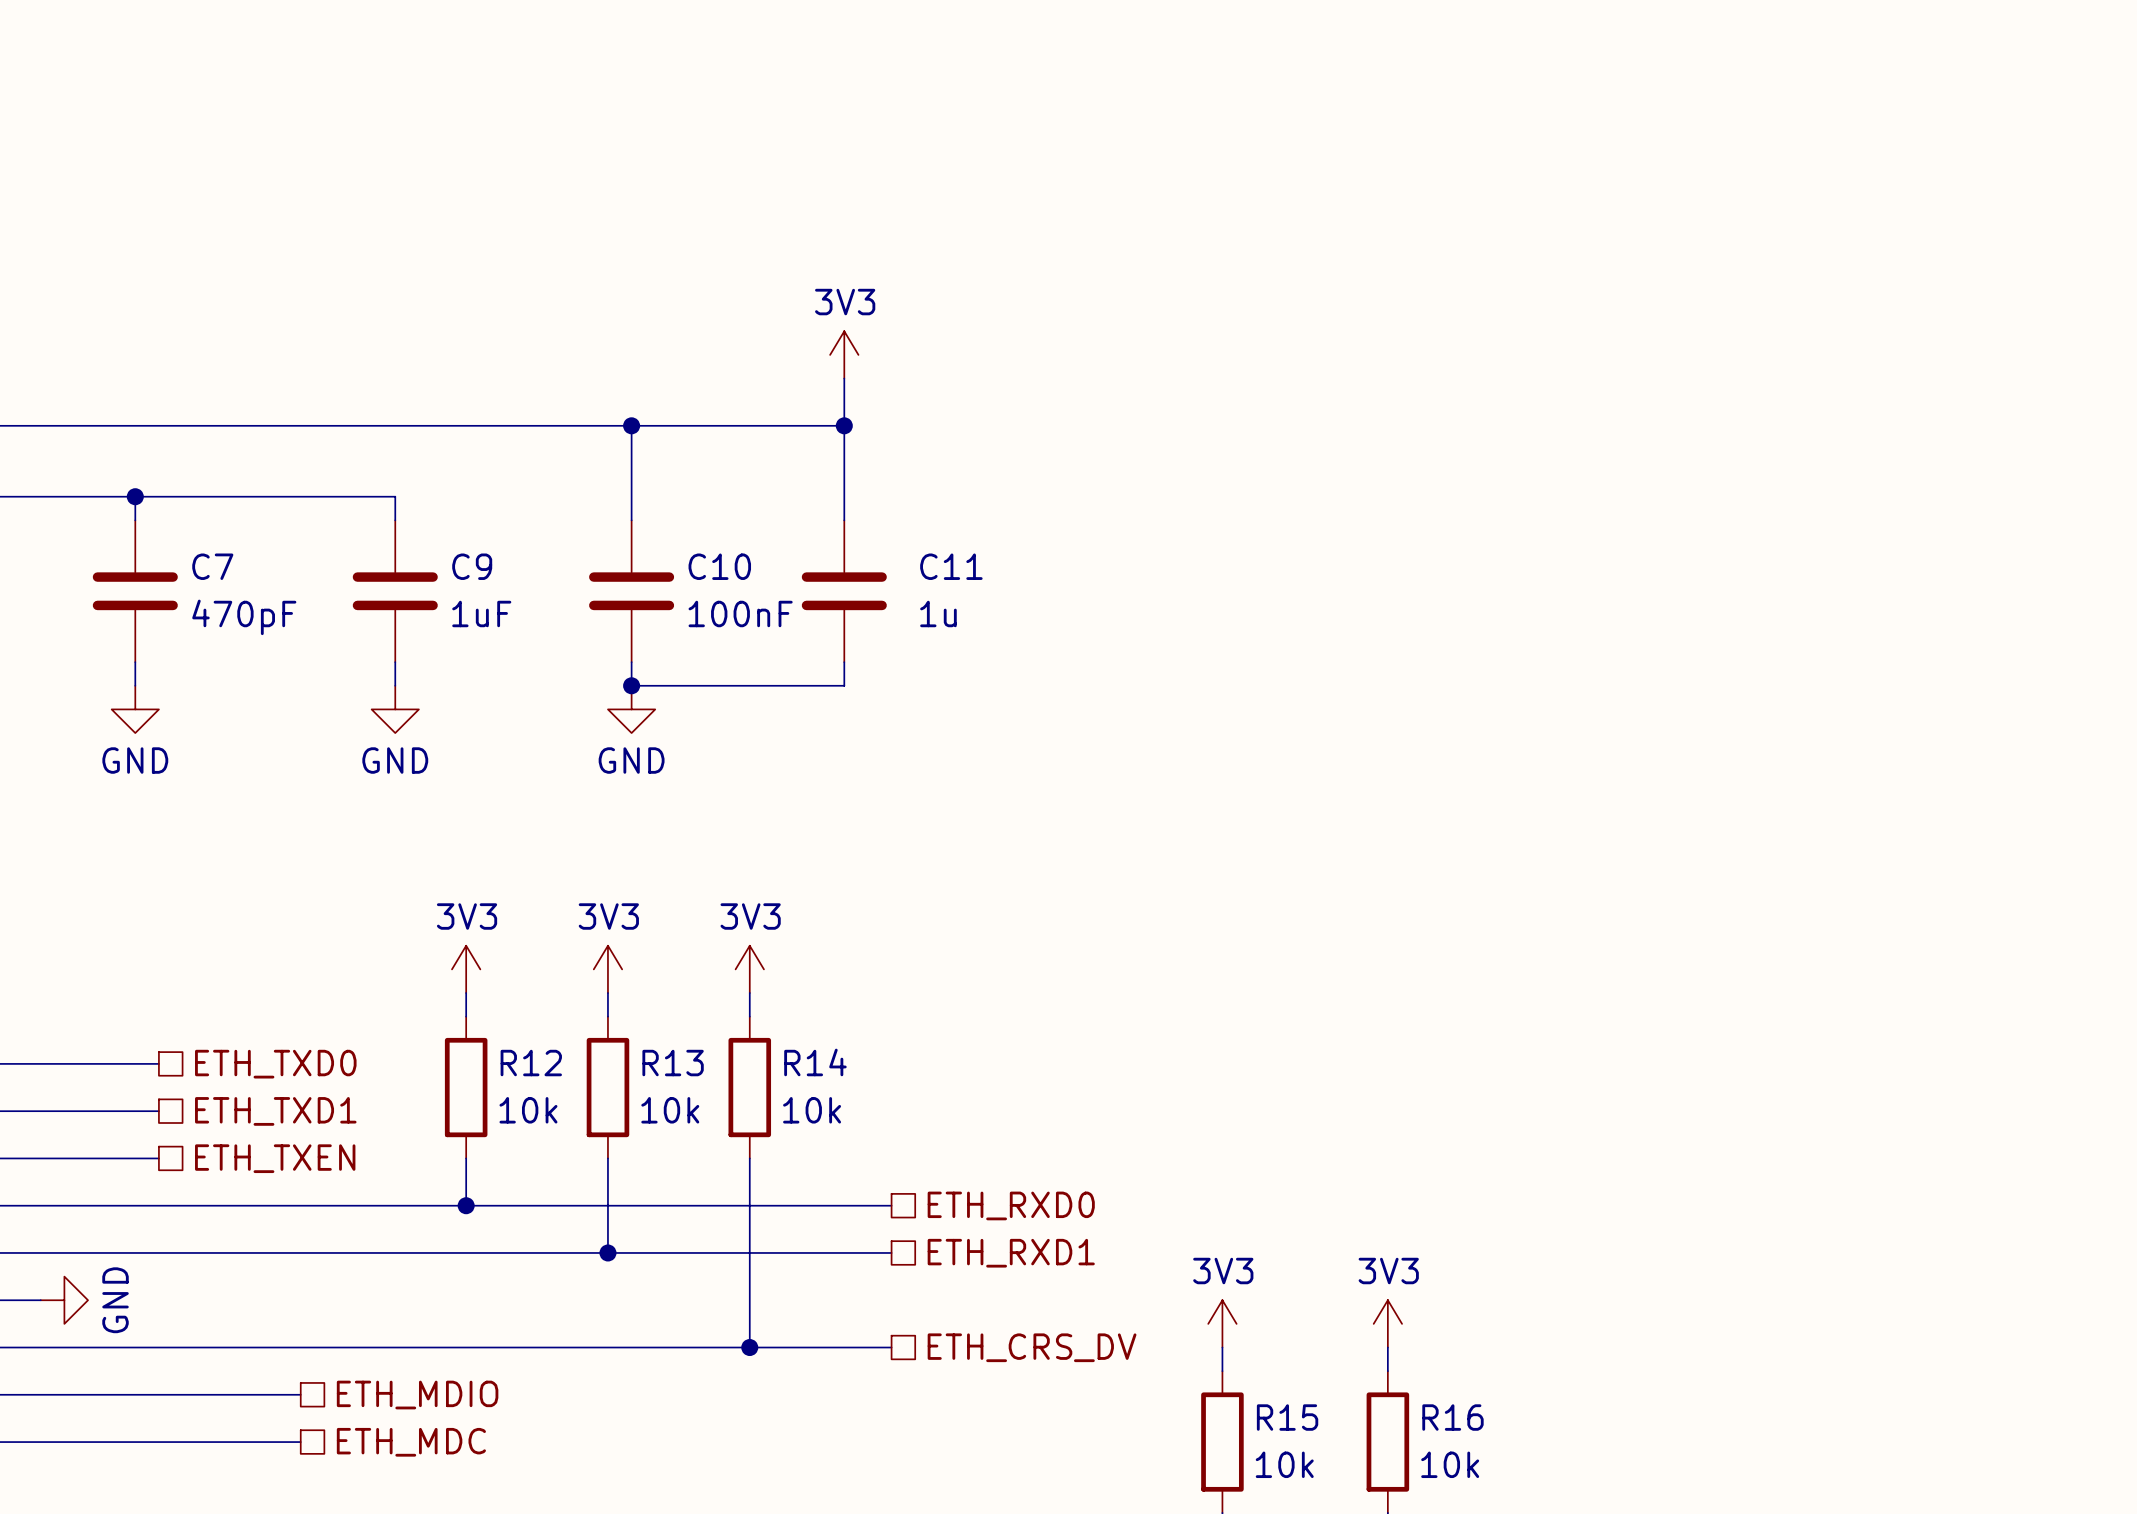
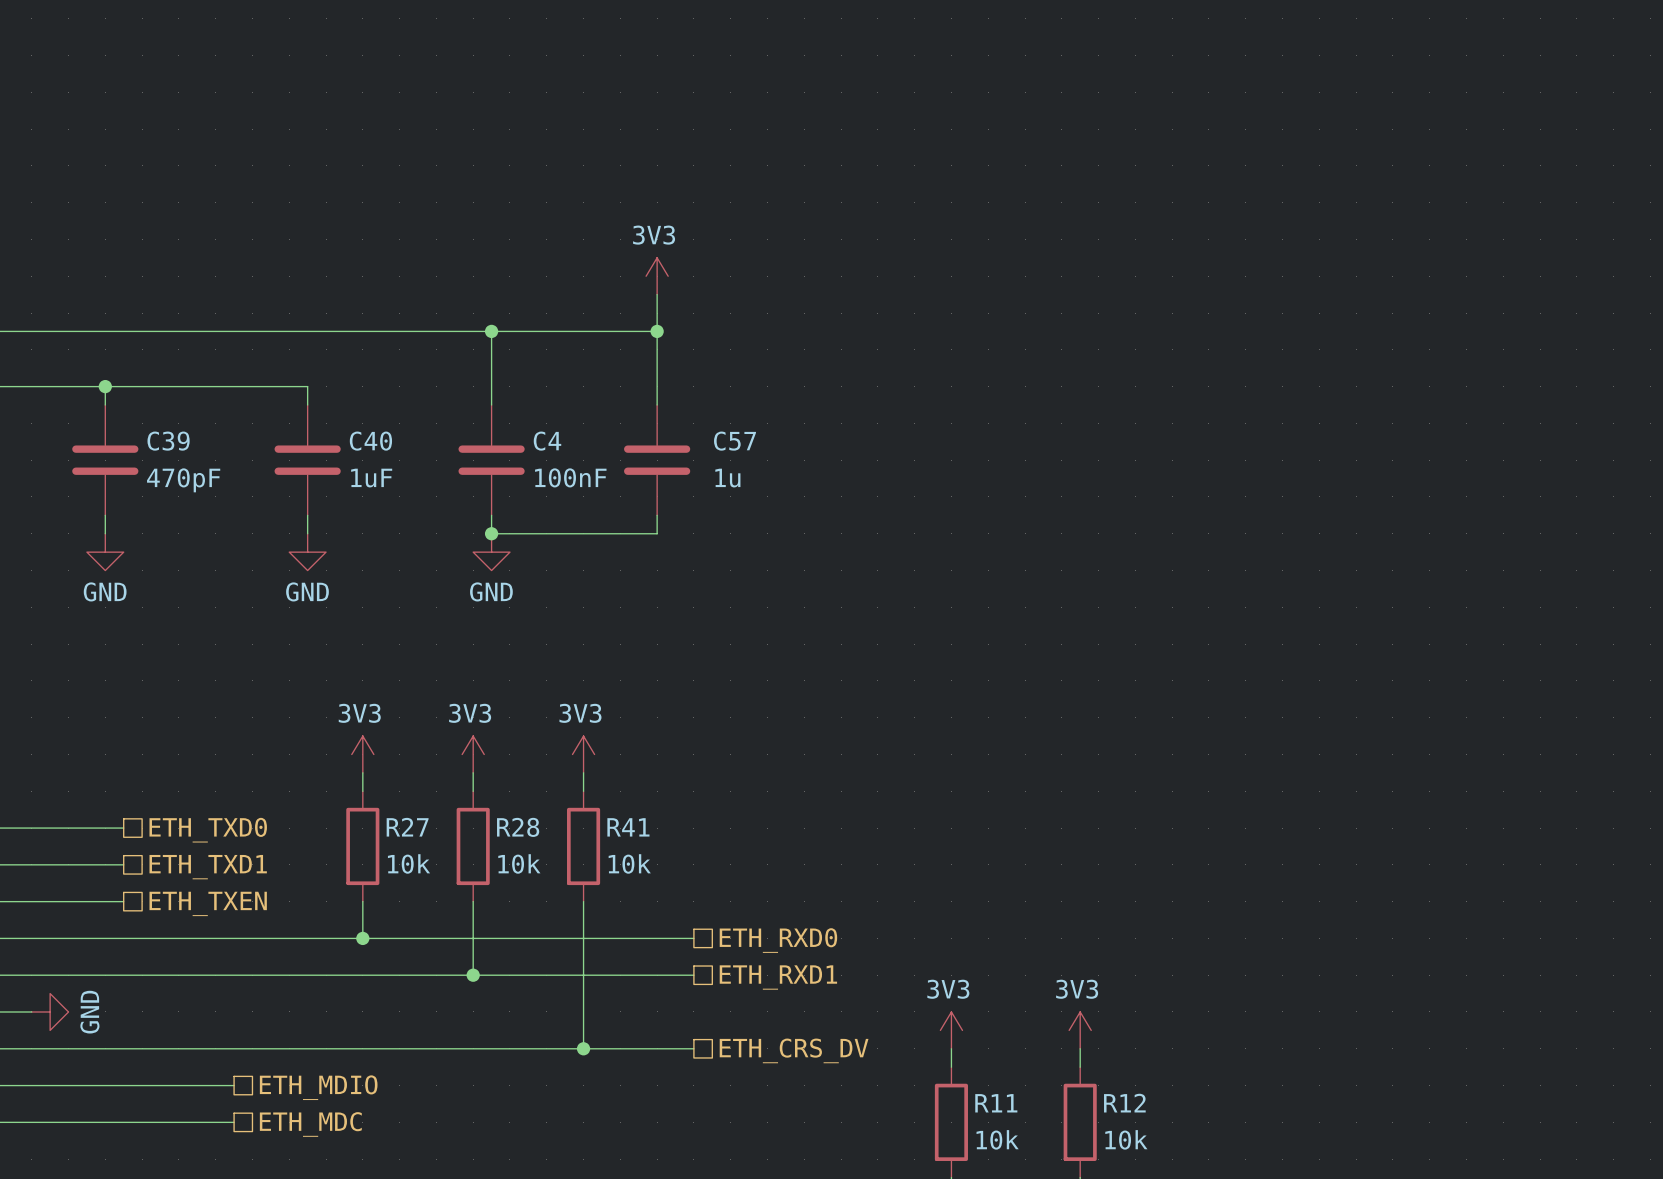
C7 name: C7 (212, 566) -> C39 (168, 441)
C9 name: C9 (472, 566) -> C40 (370, 441)
C10 name: C10 (719, 566) -> C4 (547, 441)
C11 name: C11 (951, 566) -> C57 (735, 441)
R14 name: R14 (815, 1062) -> R41 (628, 827)
R12 name: R12 (531, 1063) -> R27 (407, 827)
R13 name: R13 (673, 1063) -> R28 (518, 827)
R15 name: R15 (1287, 1417) -> R11 (996, 1103)
R16 name: R16 (1452, 1417) -> R12 (1124, 1103)

